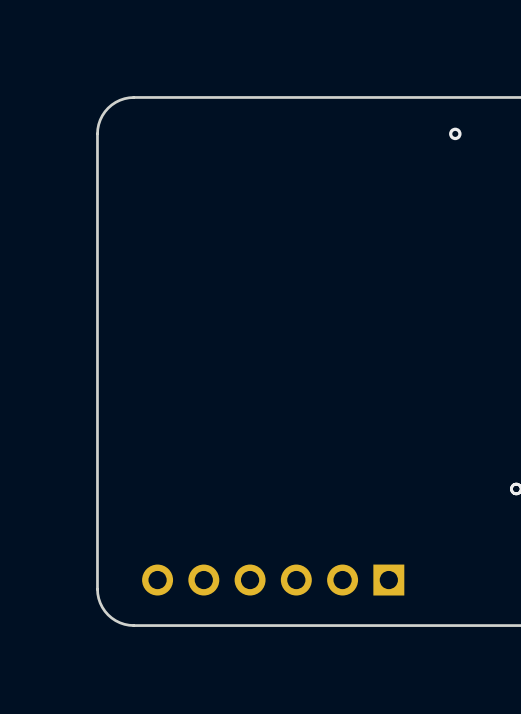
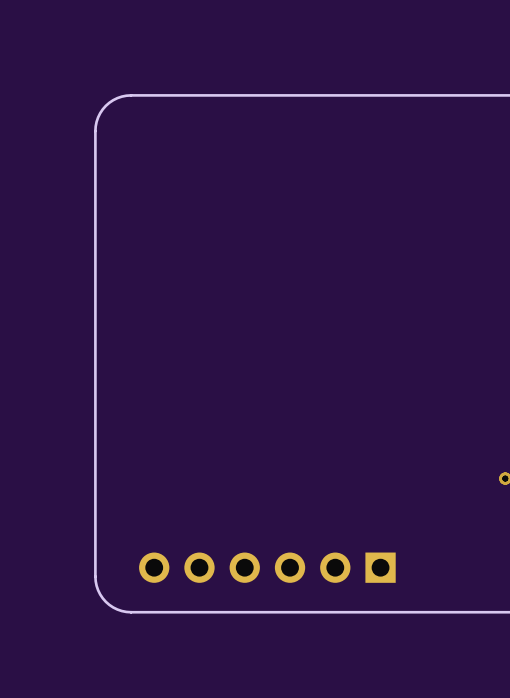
via: (455, 133) -> none

